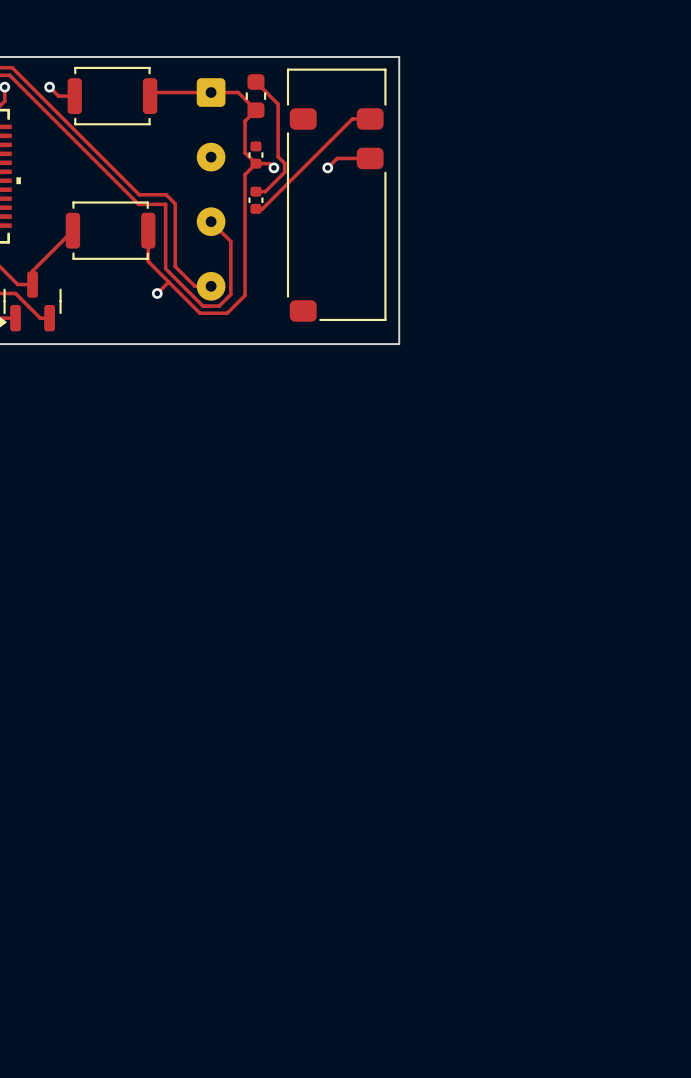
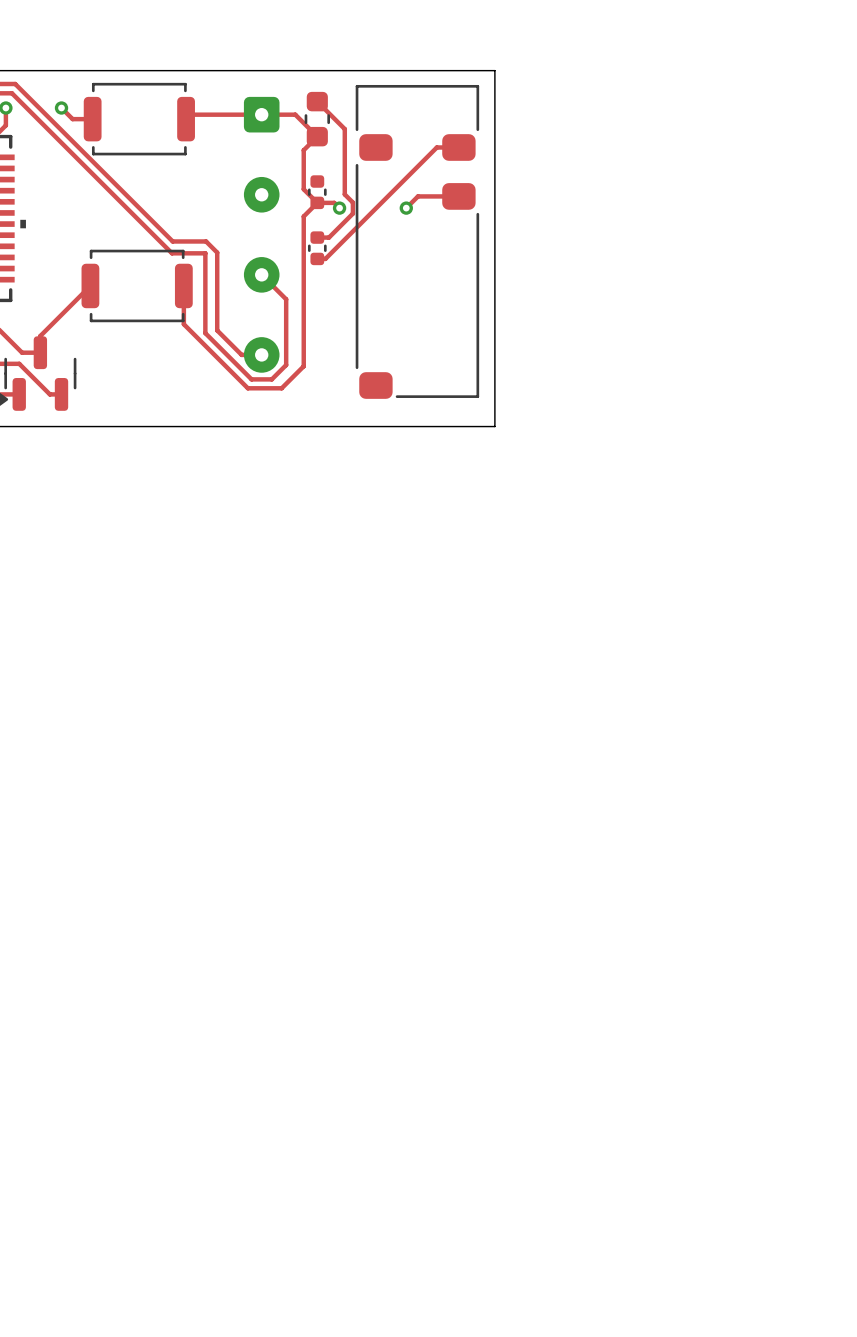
track: (168, 282) (157, 293) -> none
via: (157, 293) -> none

